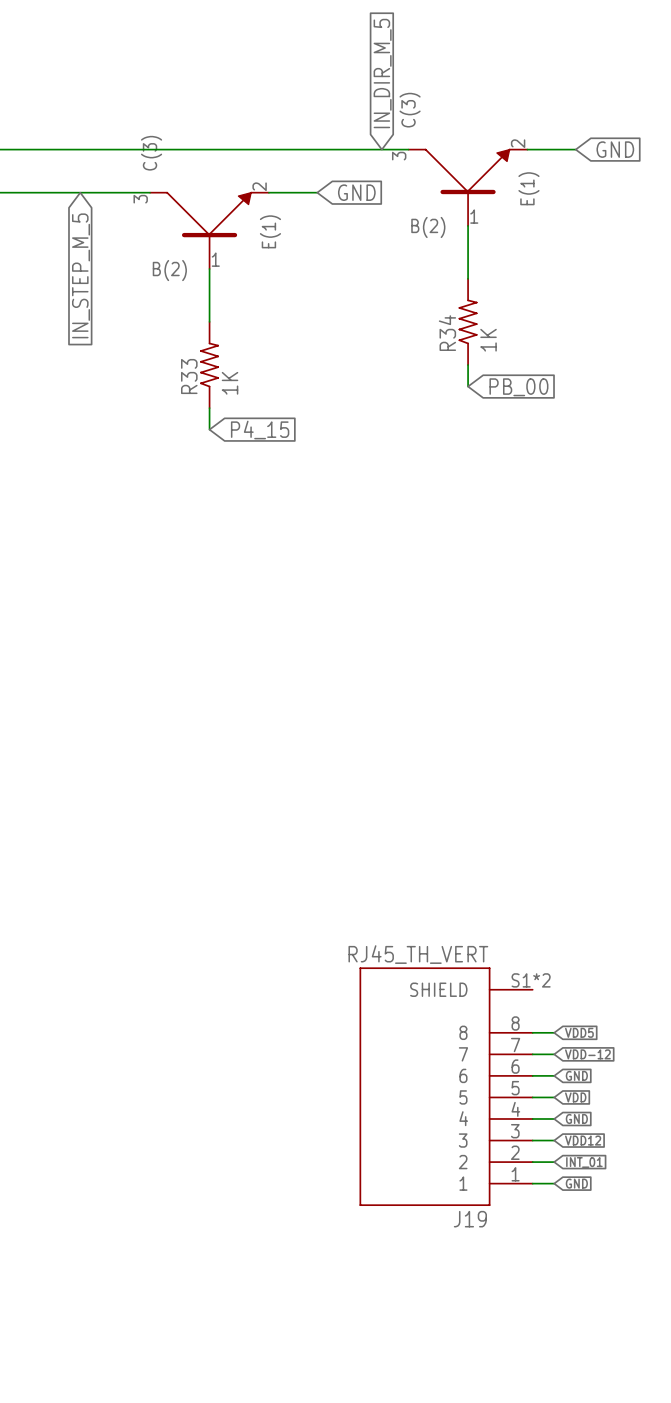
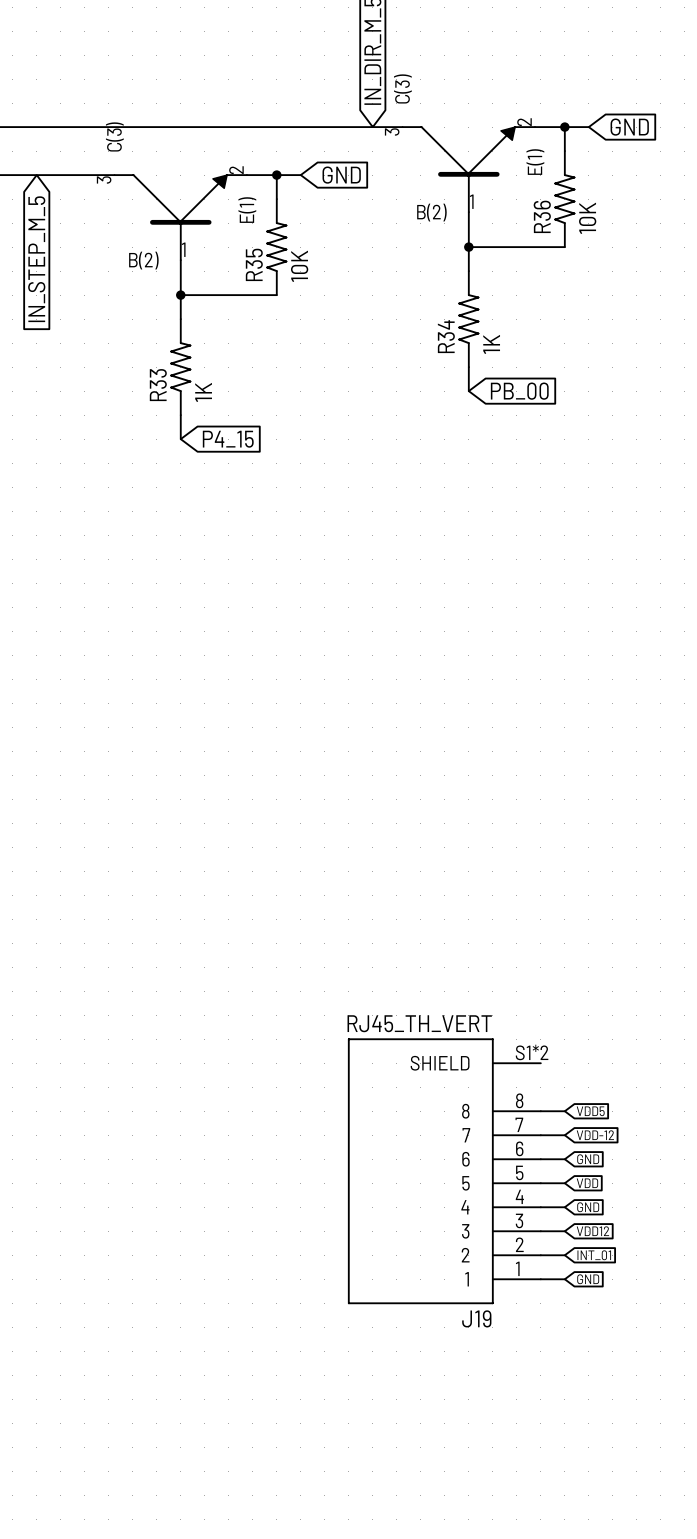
wire: none -> (564, 127) (564, 151)
junction: none -> (564, 127)
wire: none -> (276, 175) (276, 199)
junction: none -> (276, 175)
R36: none -> 10K (564, 199)
R35: none -> 10K (276, 247)
wire: none -> (468, 247) (564, 247)
junction: none -> (468, 247)
wire: none -> (180, 295) (276, 295)
junction: none -> (180, 295)

